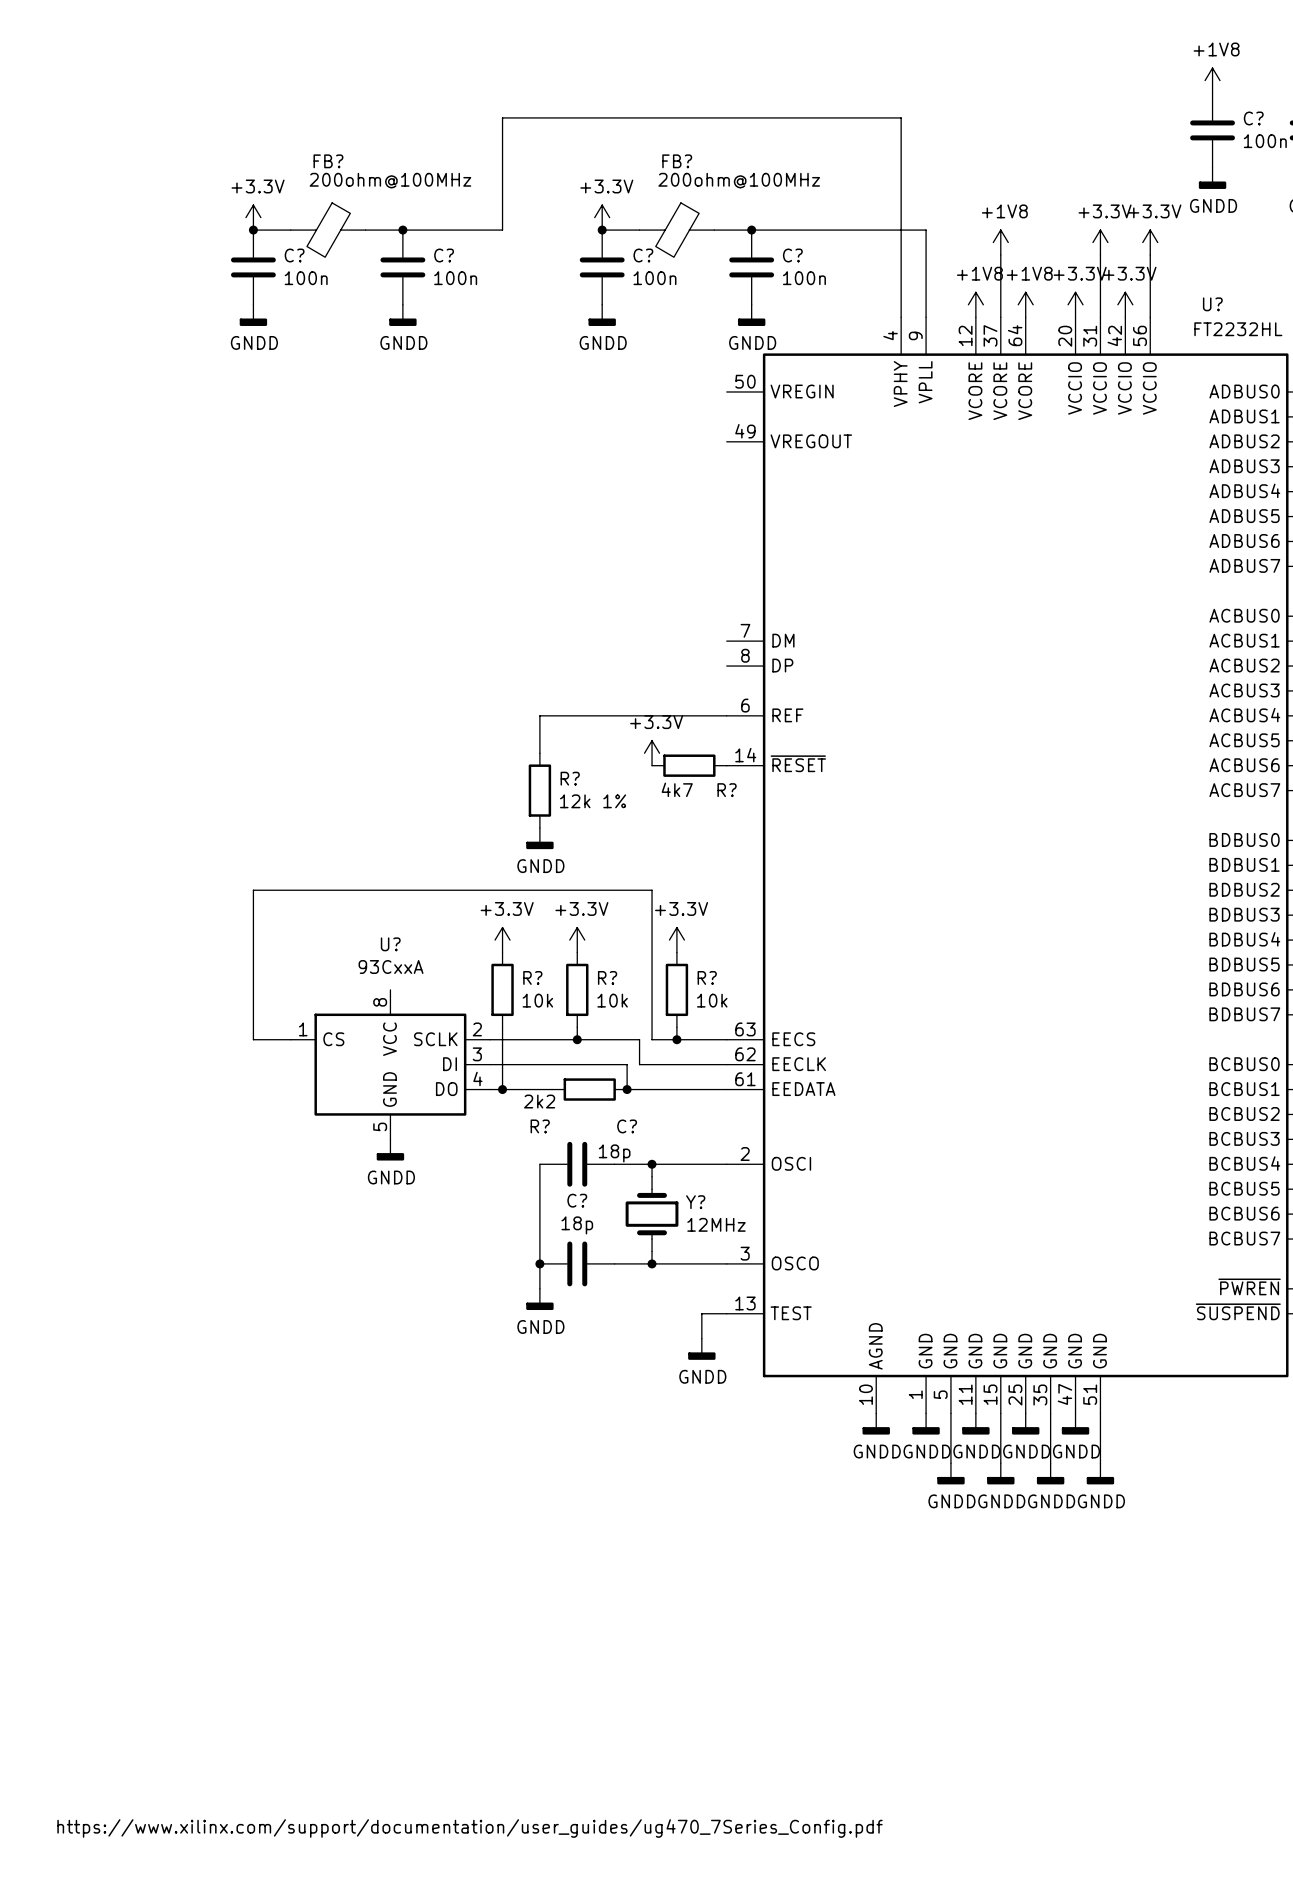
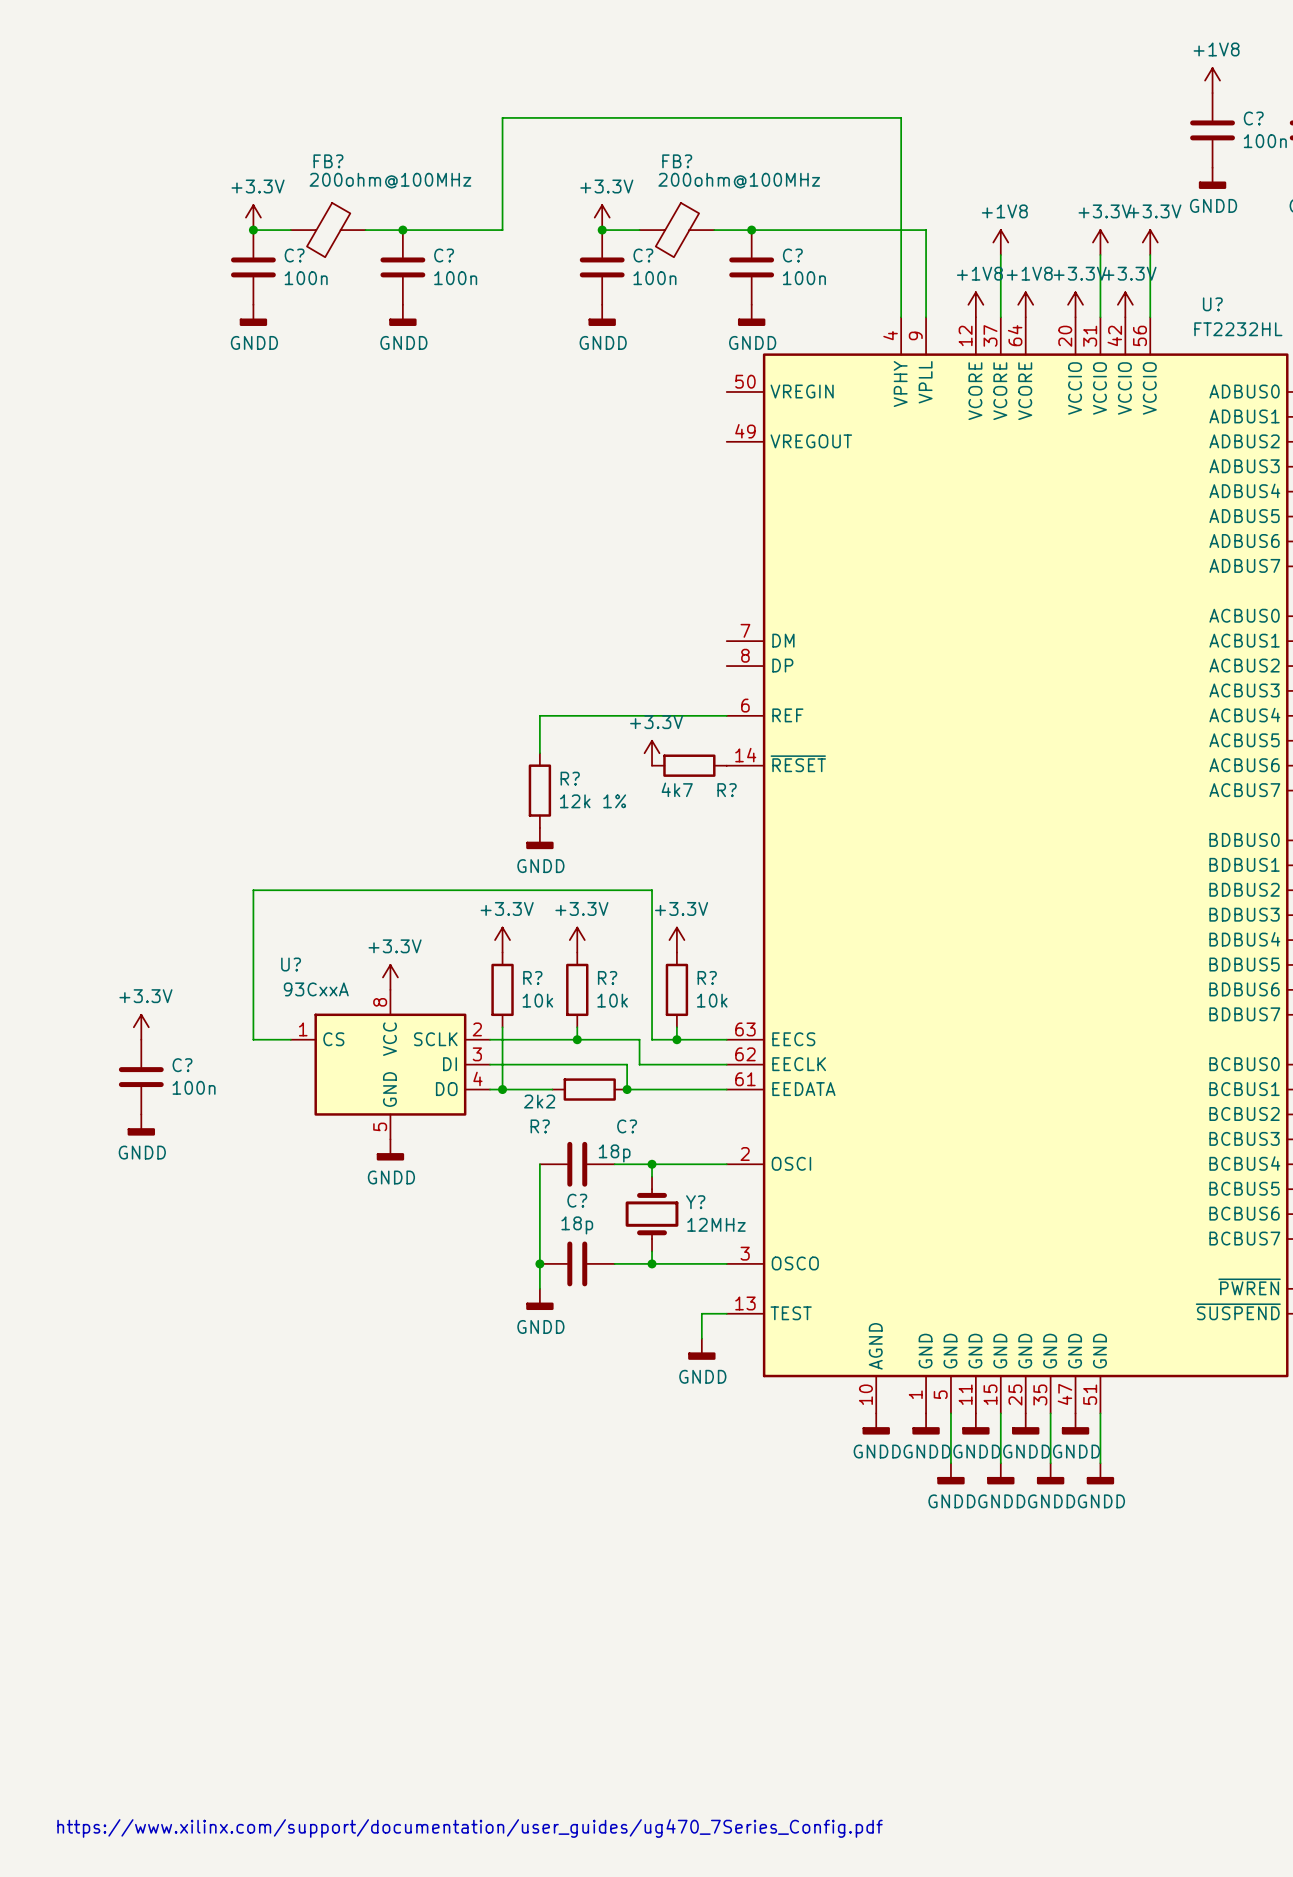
U? name position: U? (390, 944) -> U? (291, 964)
U? value position: 93CxxA (391, 967) -> 93CxxA (316, 989)
power symbol: none -> +3.3V (390, 977)
power symbol: none -> +3.3V (141, 1027)
C?: none -> 100n (141, 1077)
power symbol: none -> GNDD (141, 1125)

